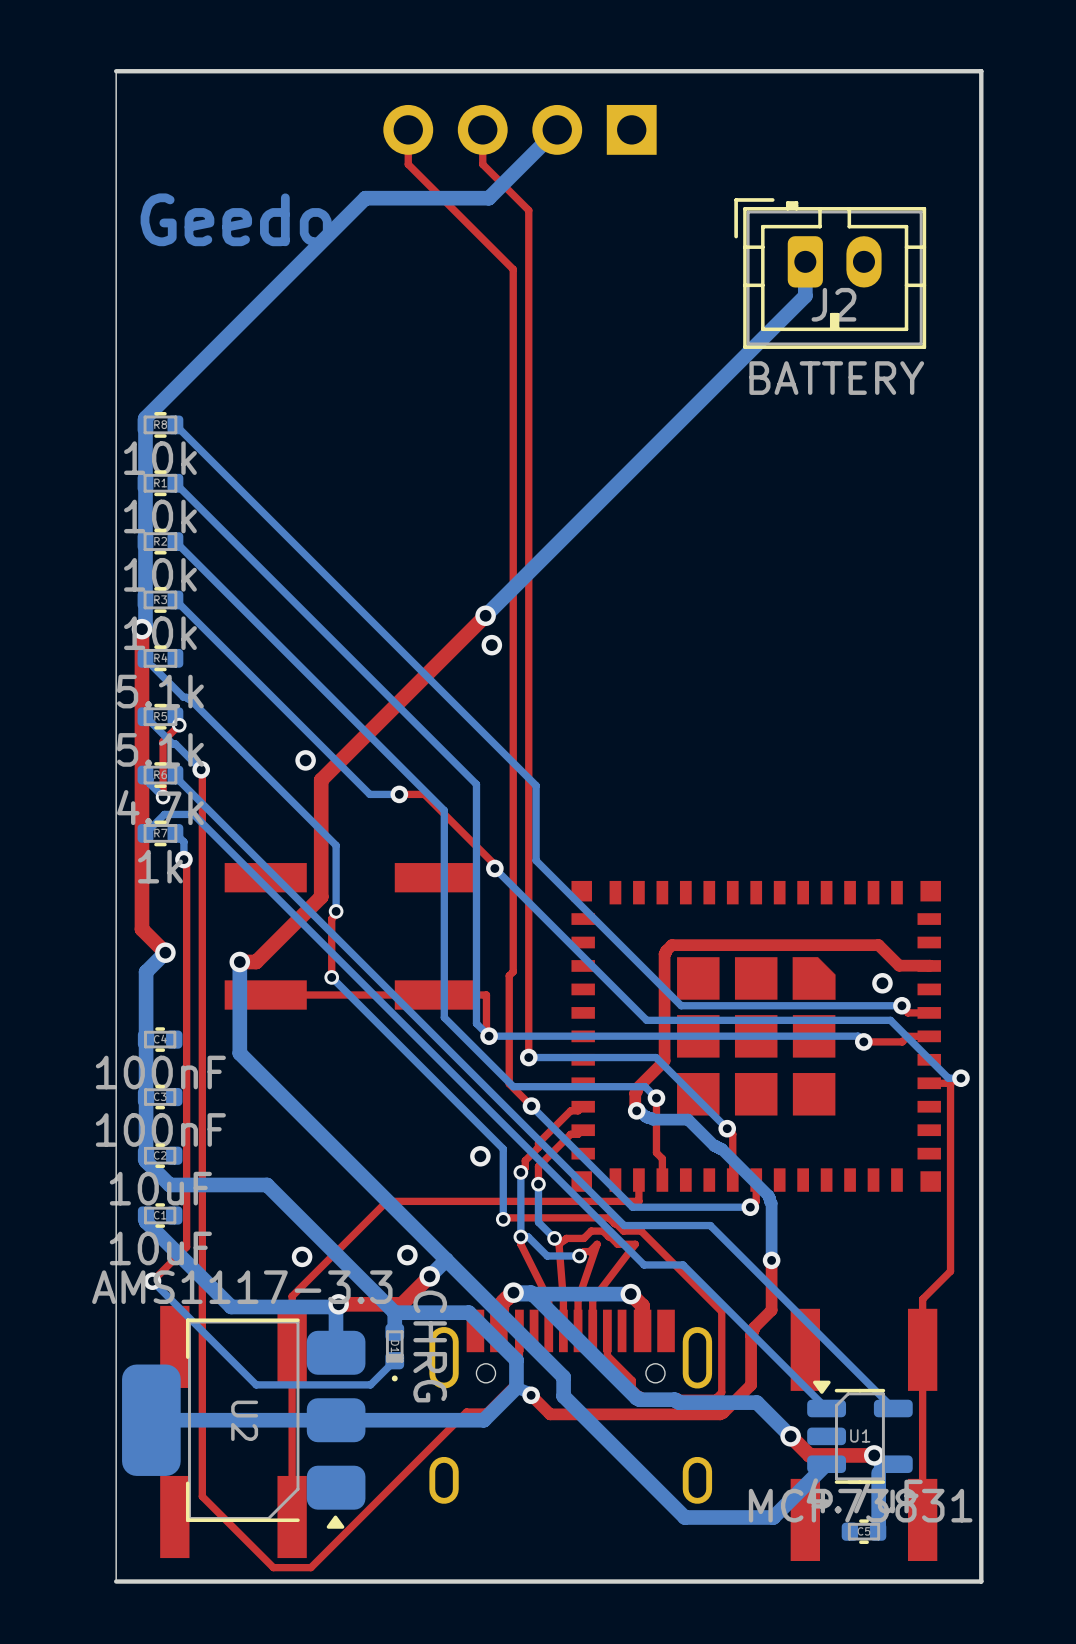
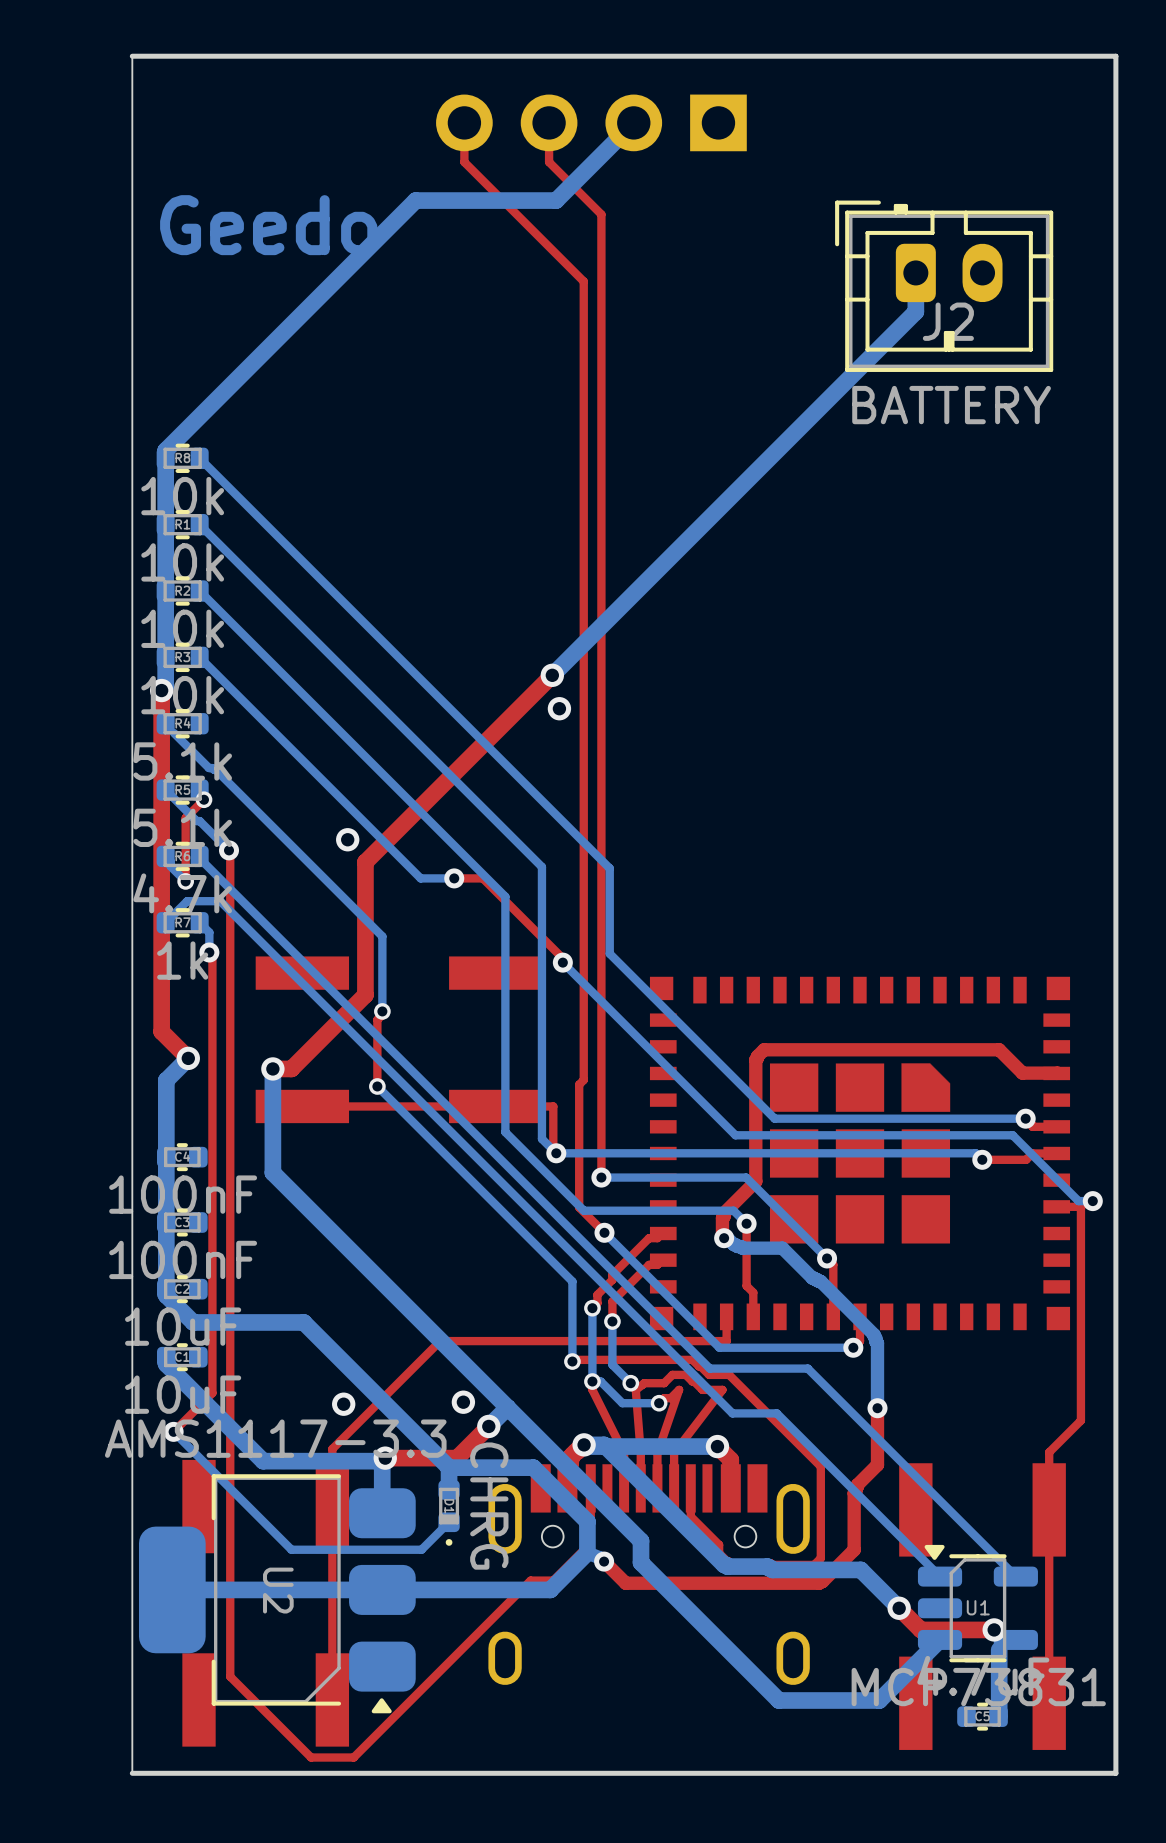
via: (882, 983) -> none
via: (480, 1156) -> none

